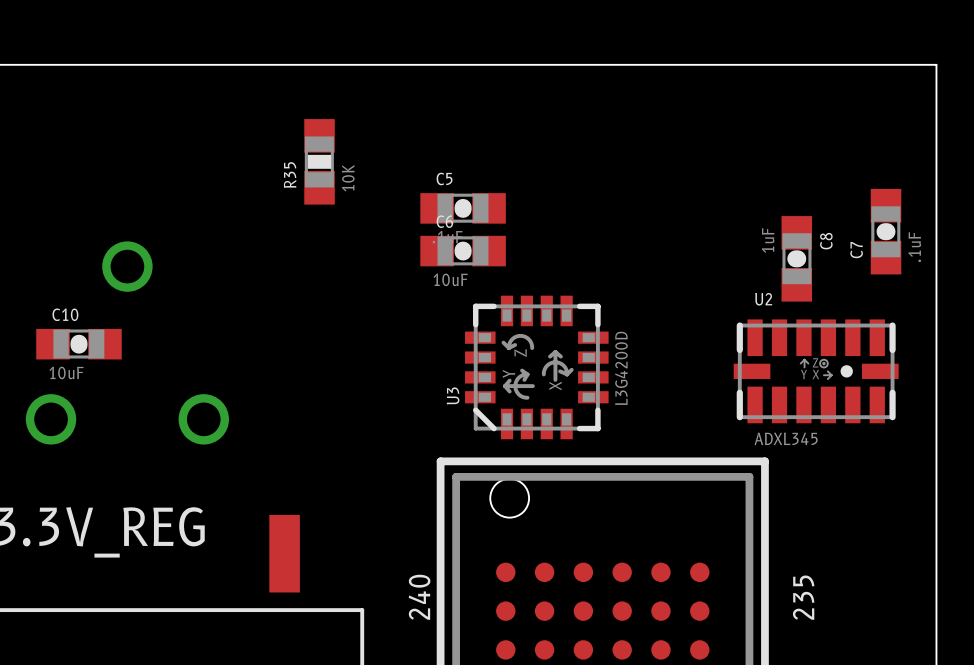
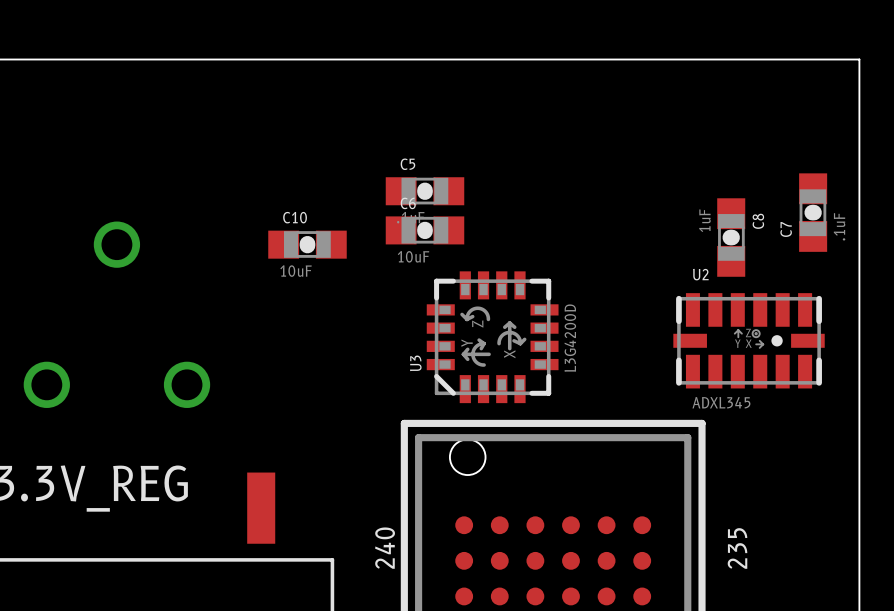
R35: 10K (319, 161) -> none
C10 position: (78, 344) -> (307, 244)

